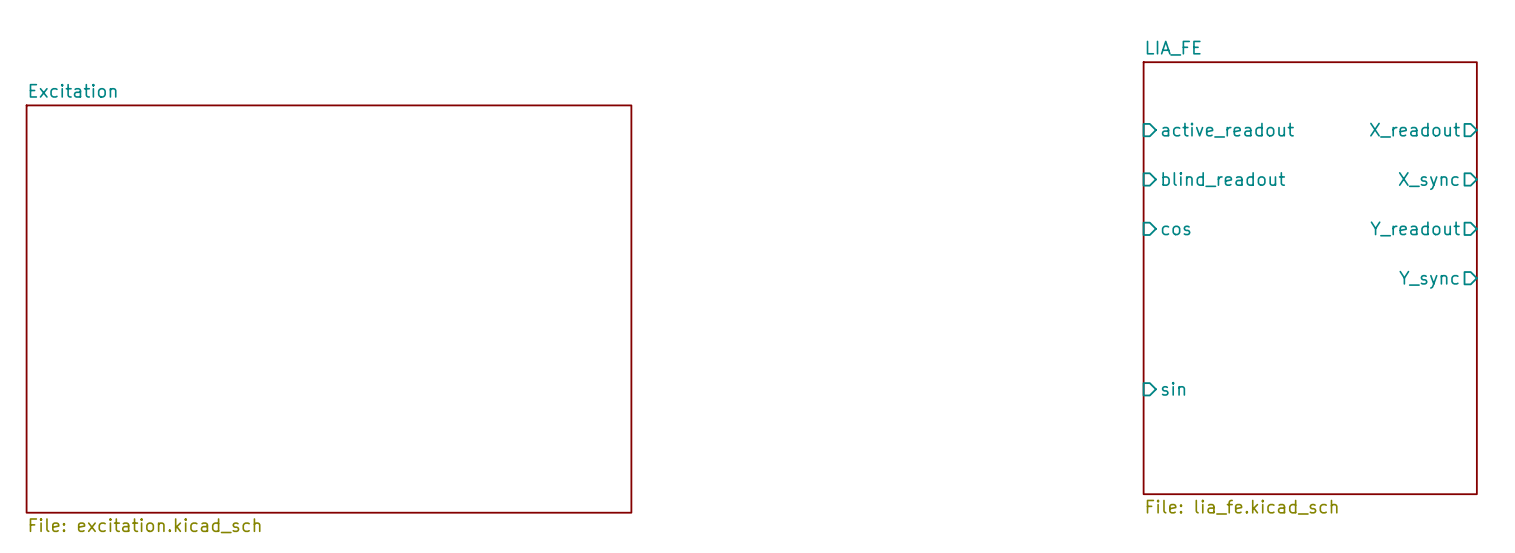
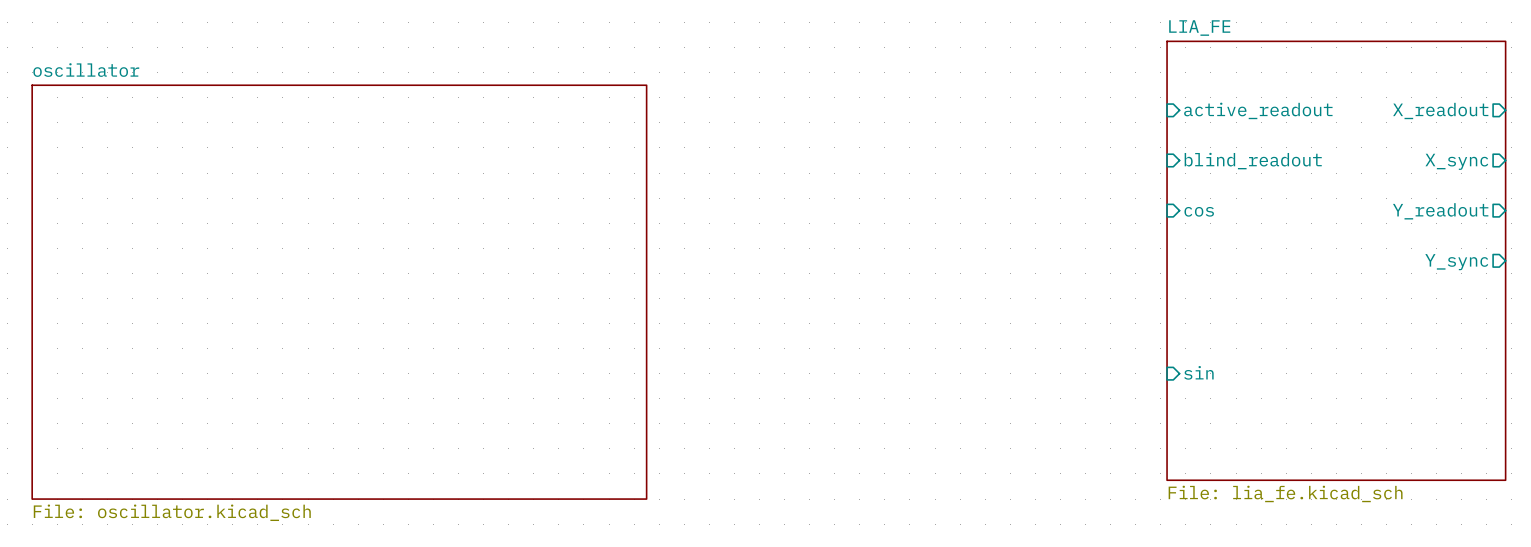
sheet Excitation name: Excitation (73, 90) -> oscillator (86, 70)
sheet Excitation value: File: excitation.kicad_sch (145, 525) -> File: oscillator.kicad_sch (172, 512)

